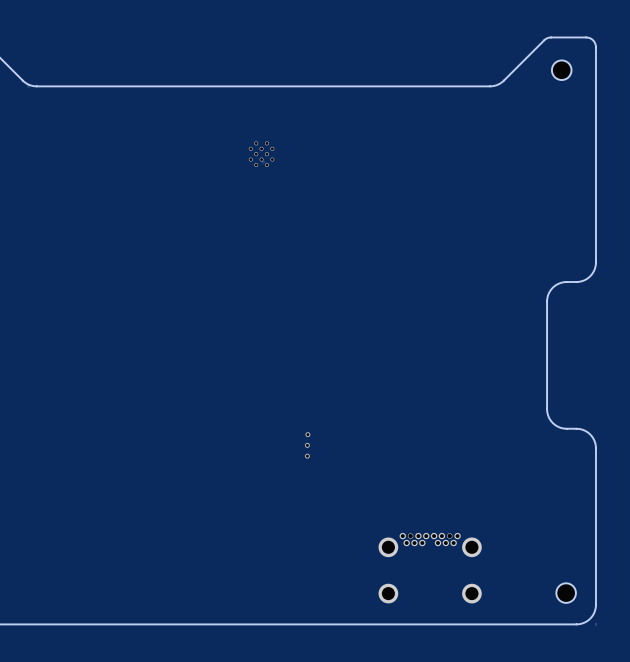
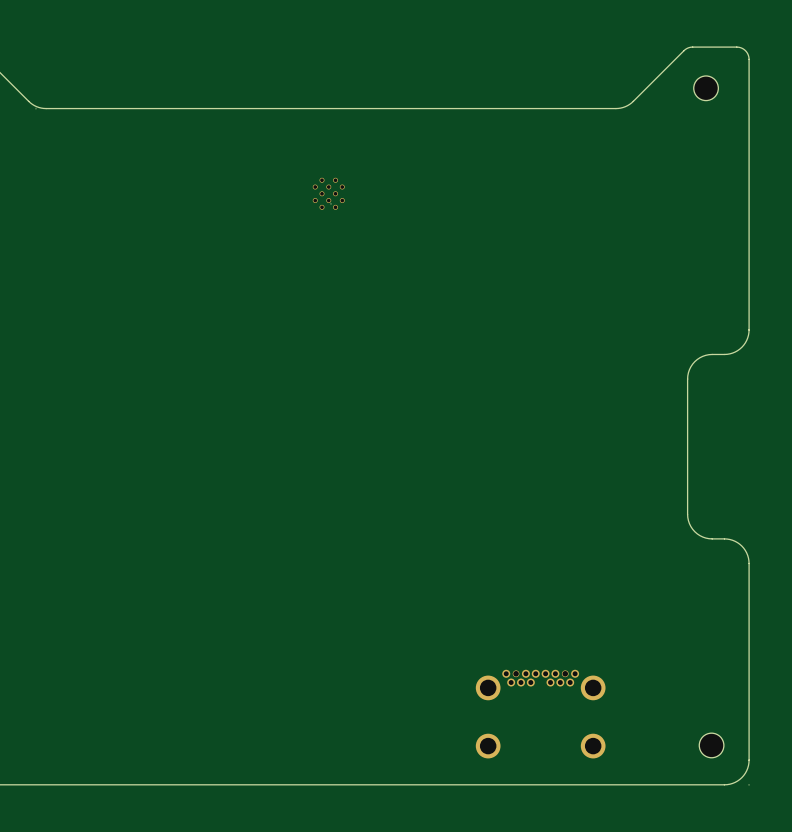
via: (307, 434) -> none
via: (307, 445) -> none
via: (307, 456) -> none

